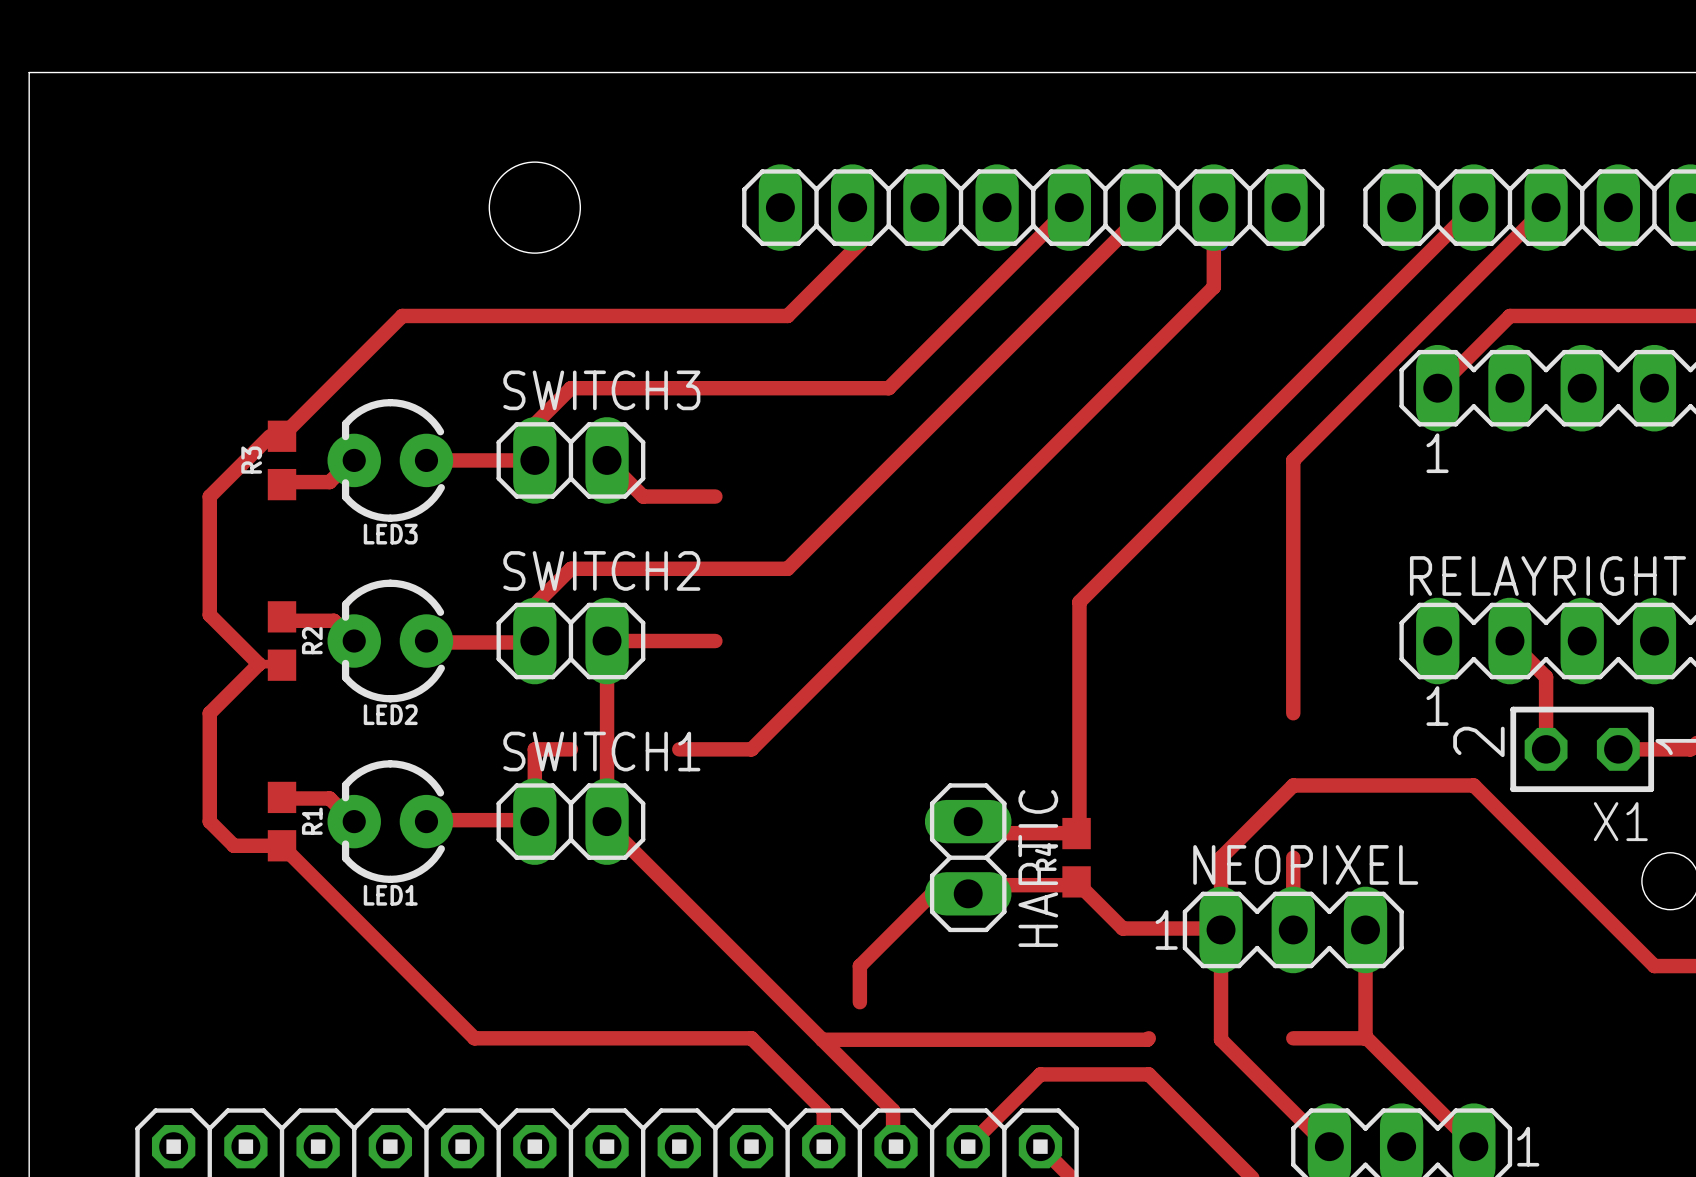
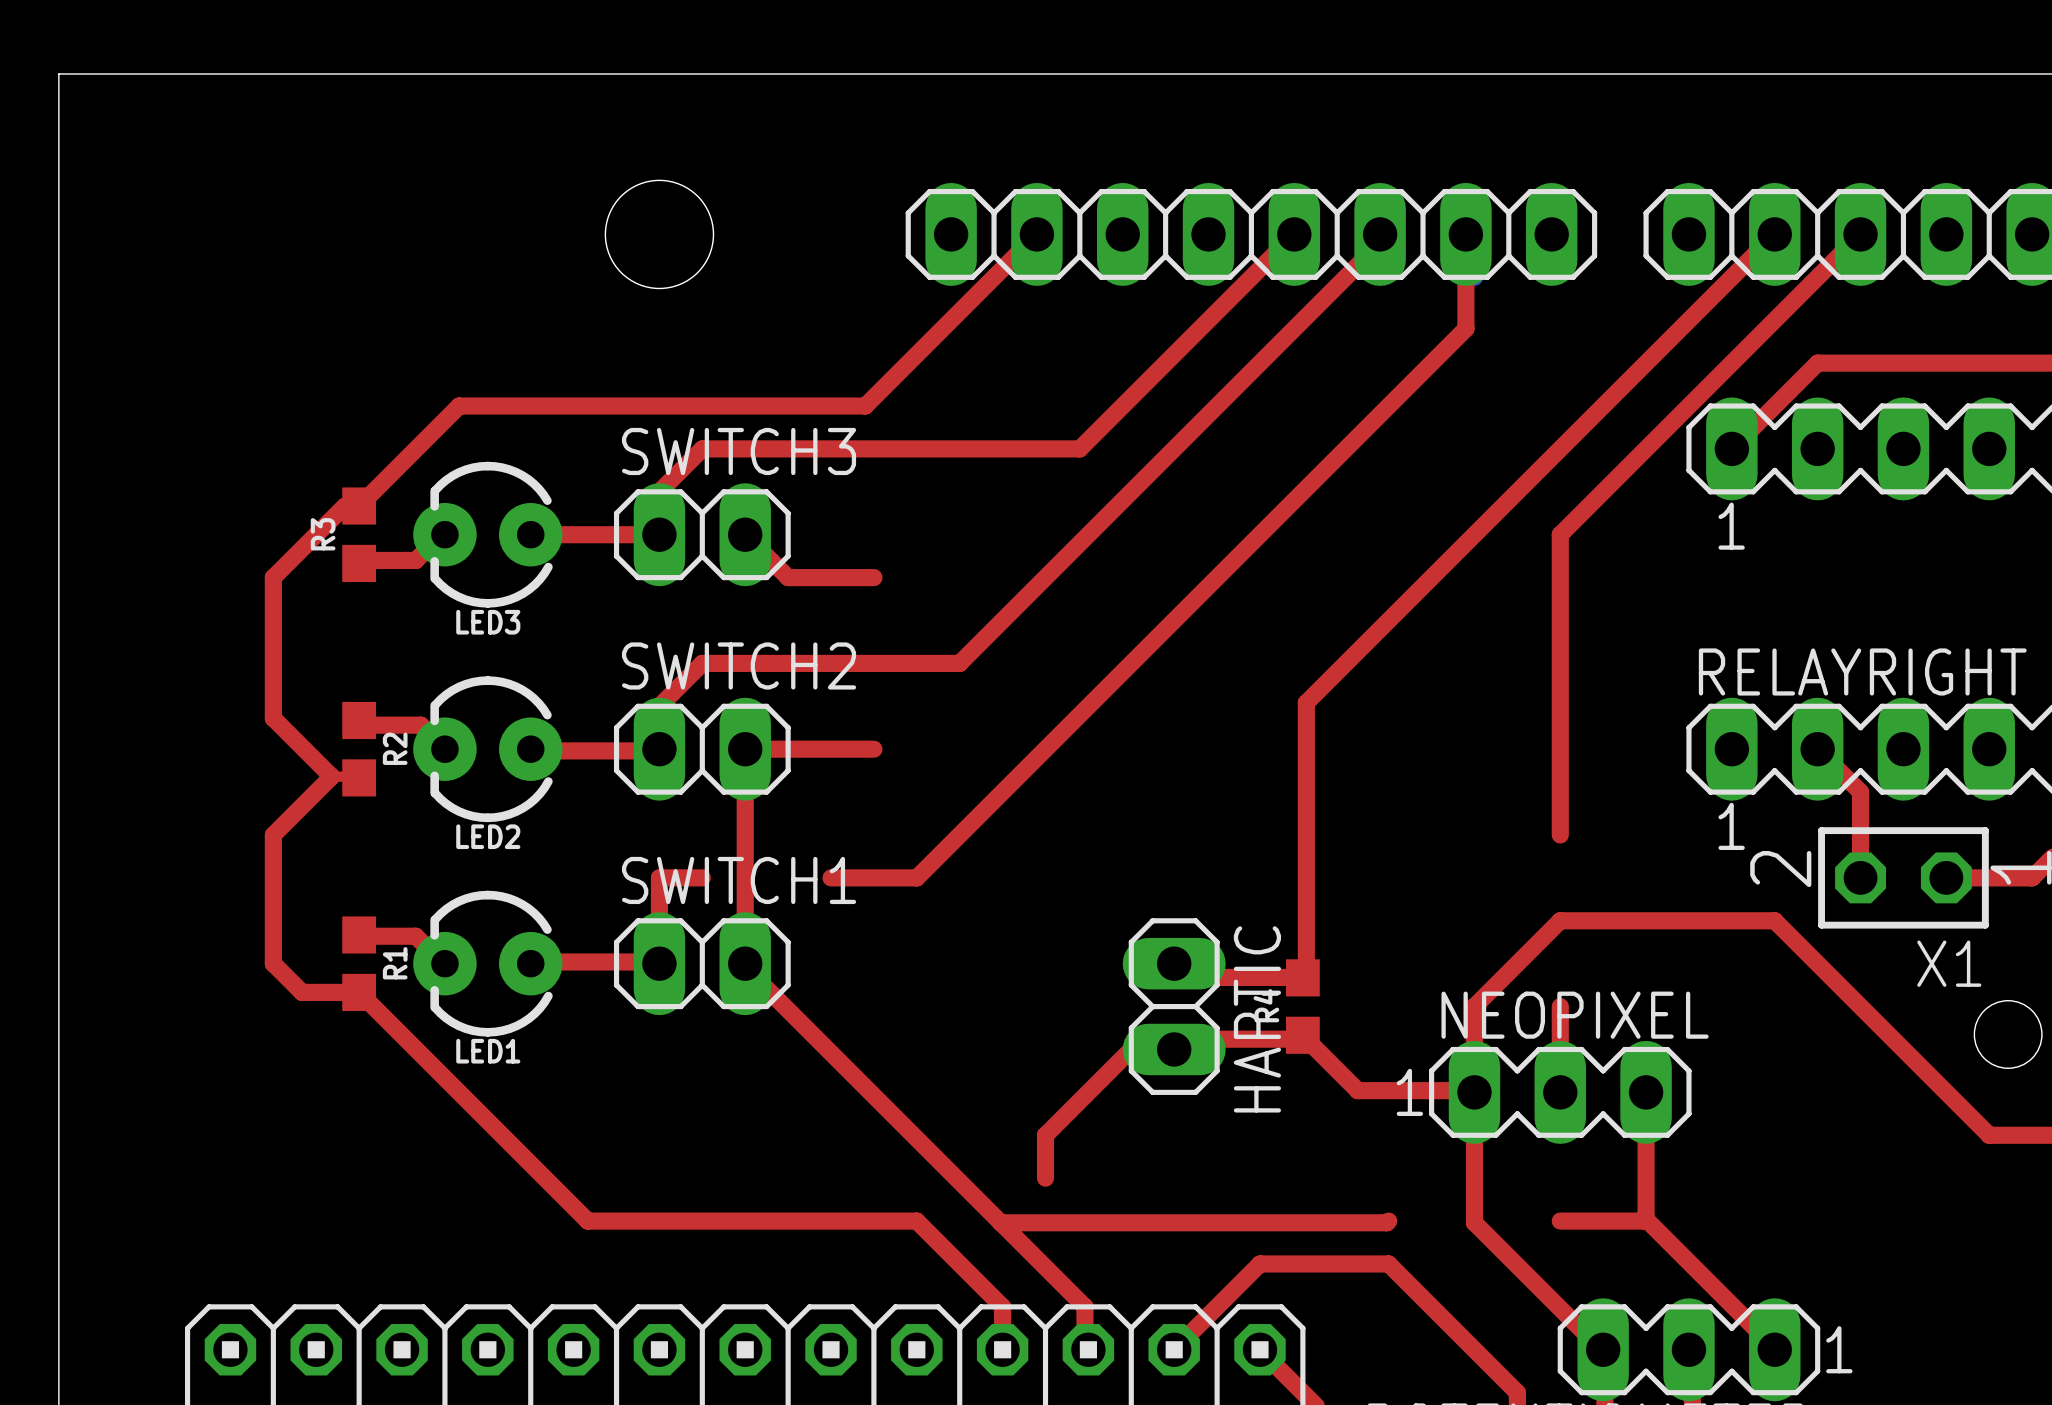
top track: (852, 207) (852, 236) (859, 243) (787, 315) (402, 315) (366, 352) -> (1036, 234) (865, 406) (459, 406)

